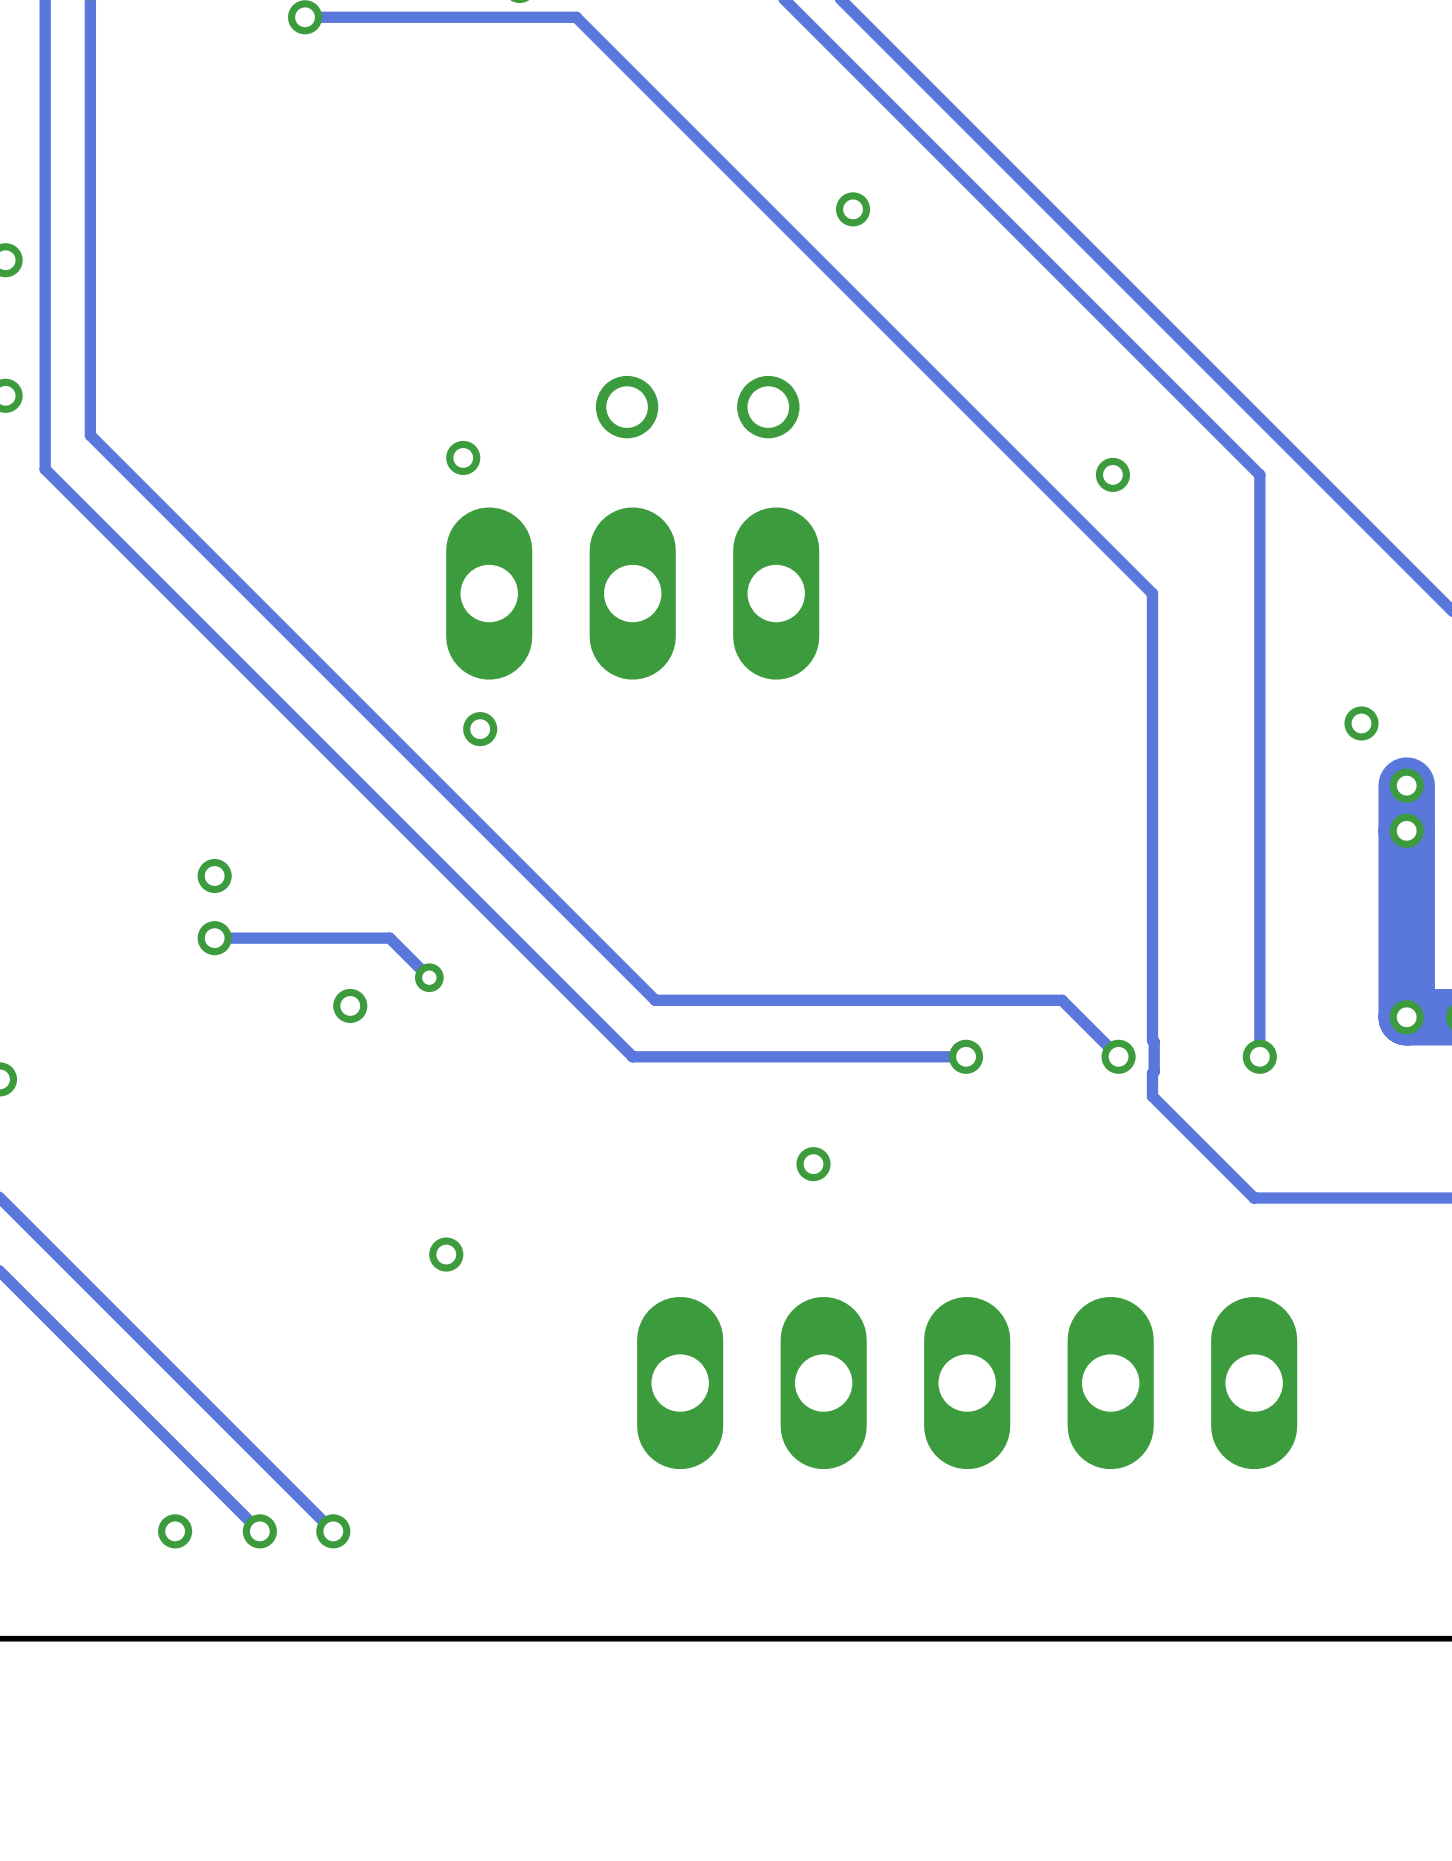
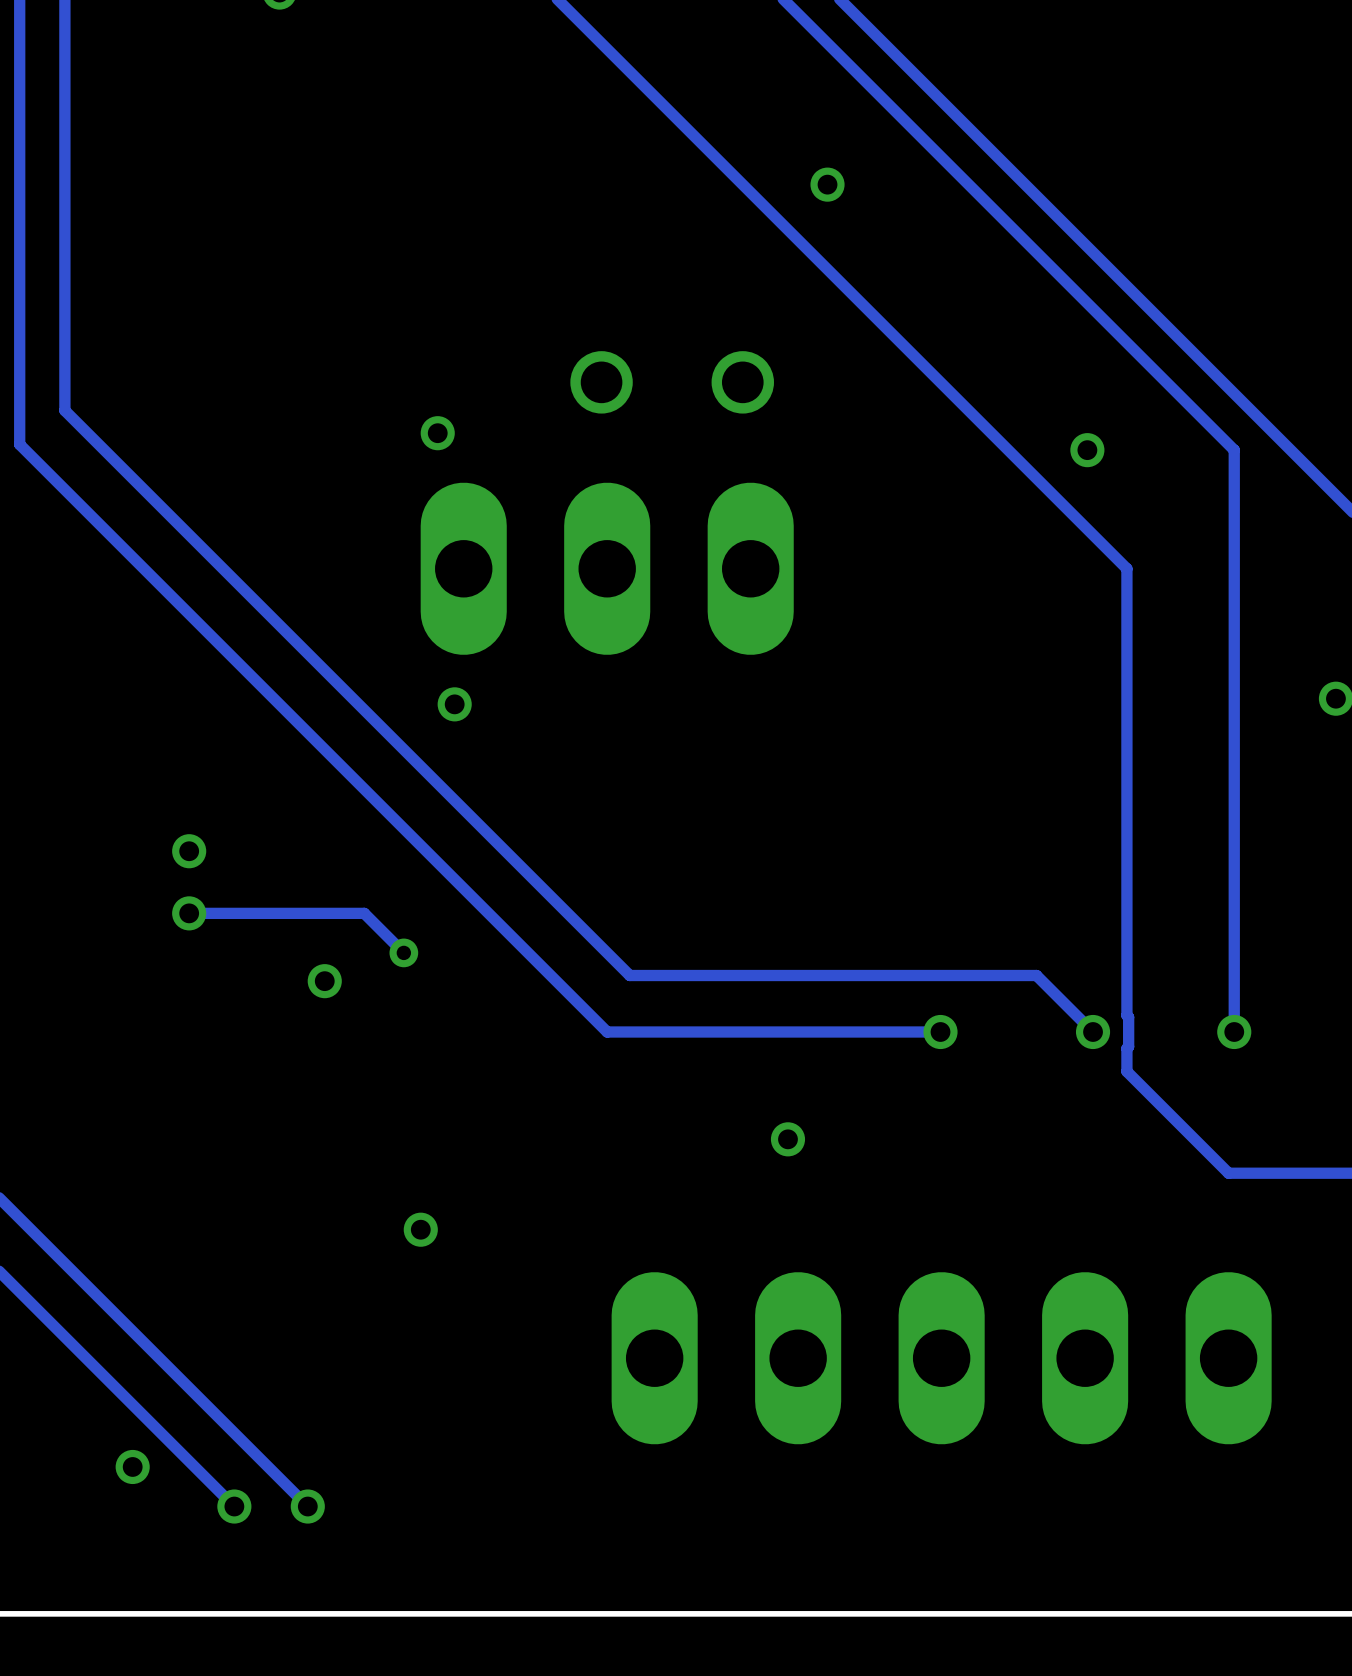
via position: (175, 1531) -> (132, 1466)

